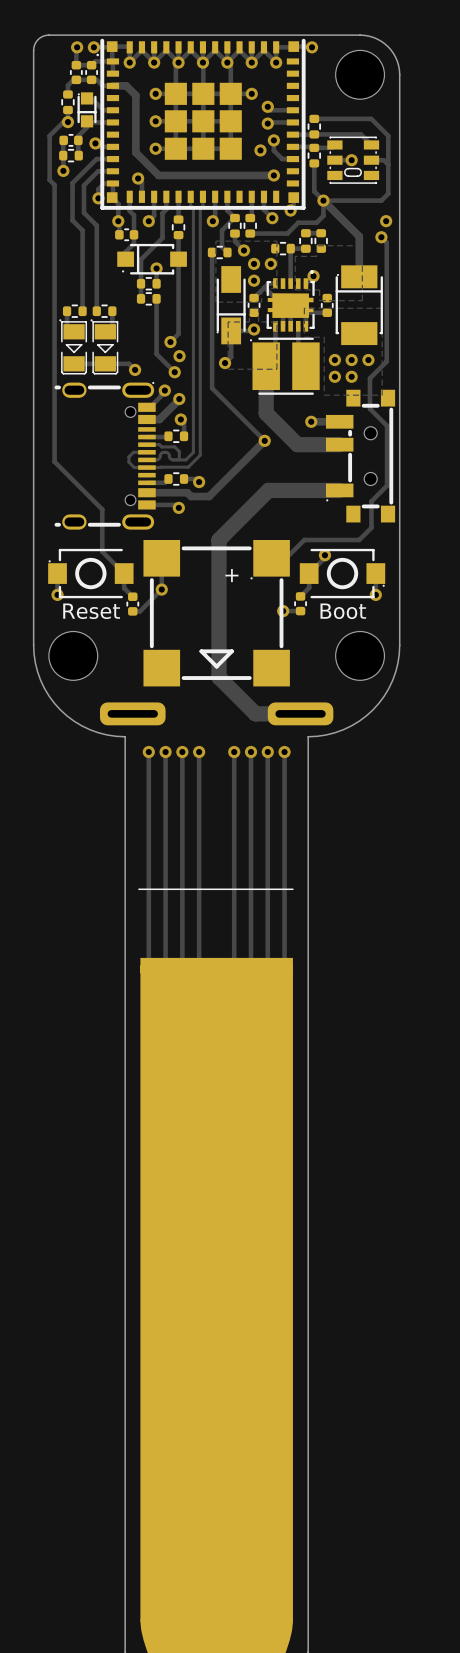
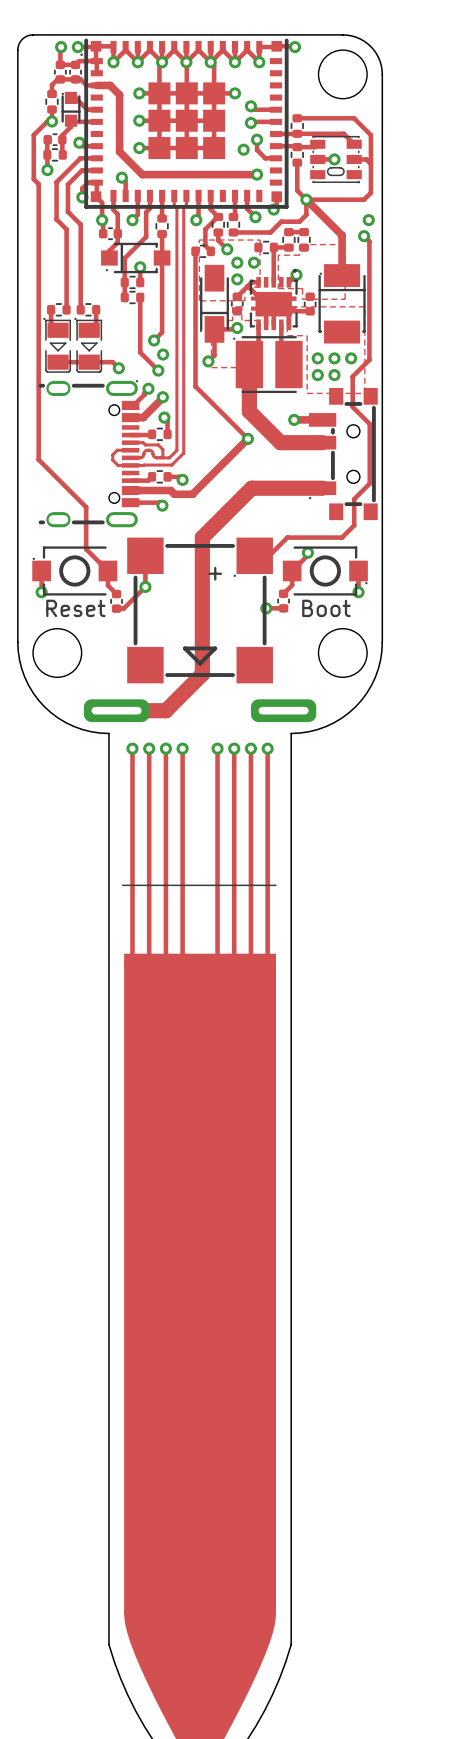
track: (218, 677) (255, 713) (300, 713) -> (202, 674) (165, 710) (116, 710)

